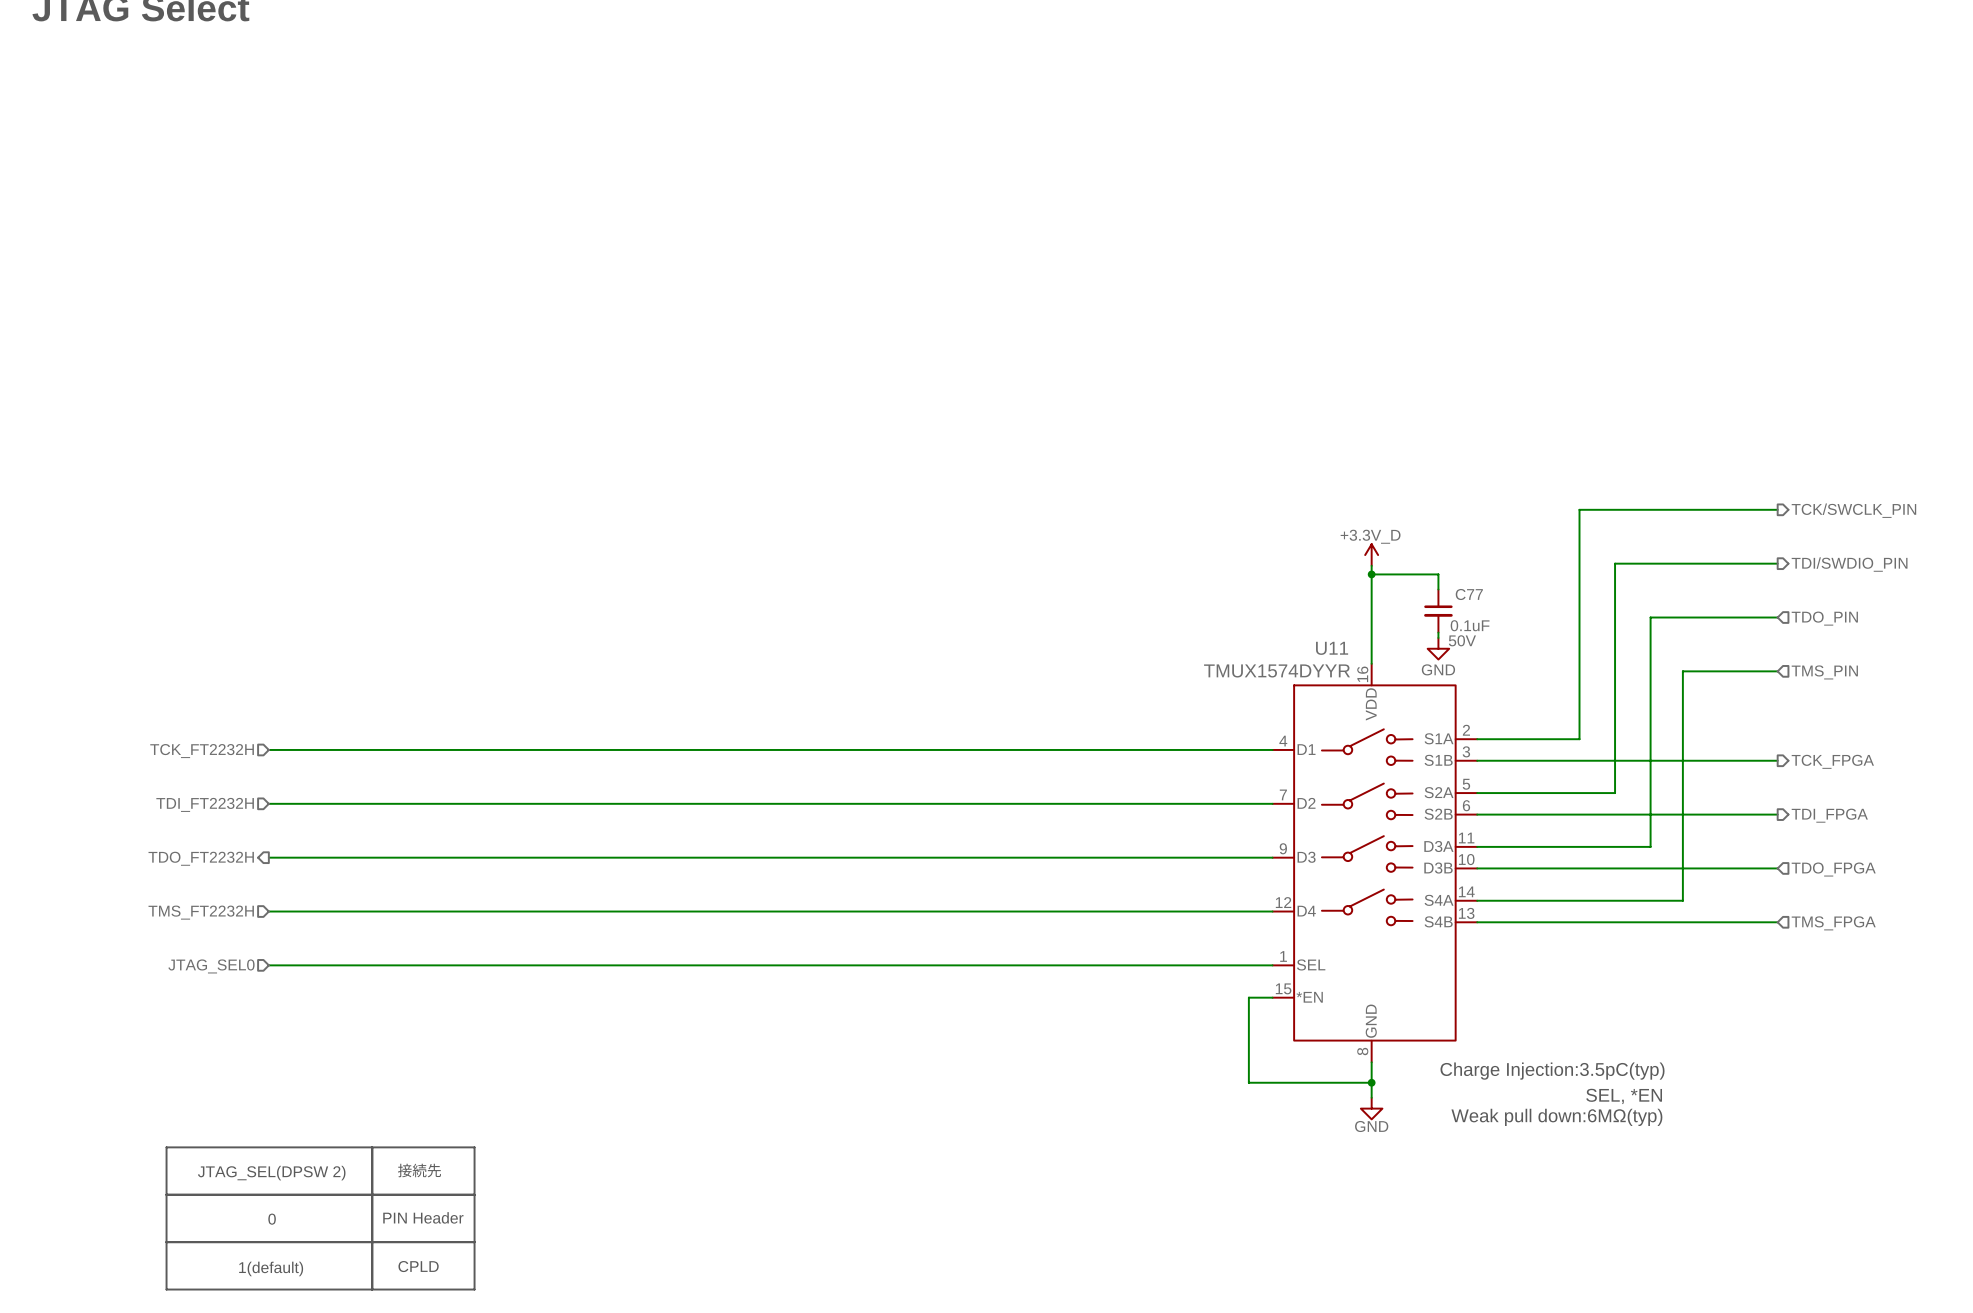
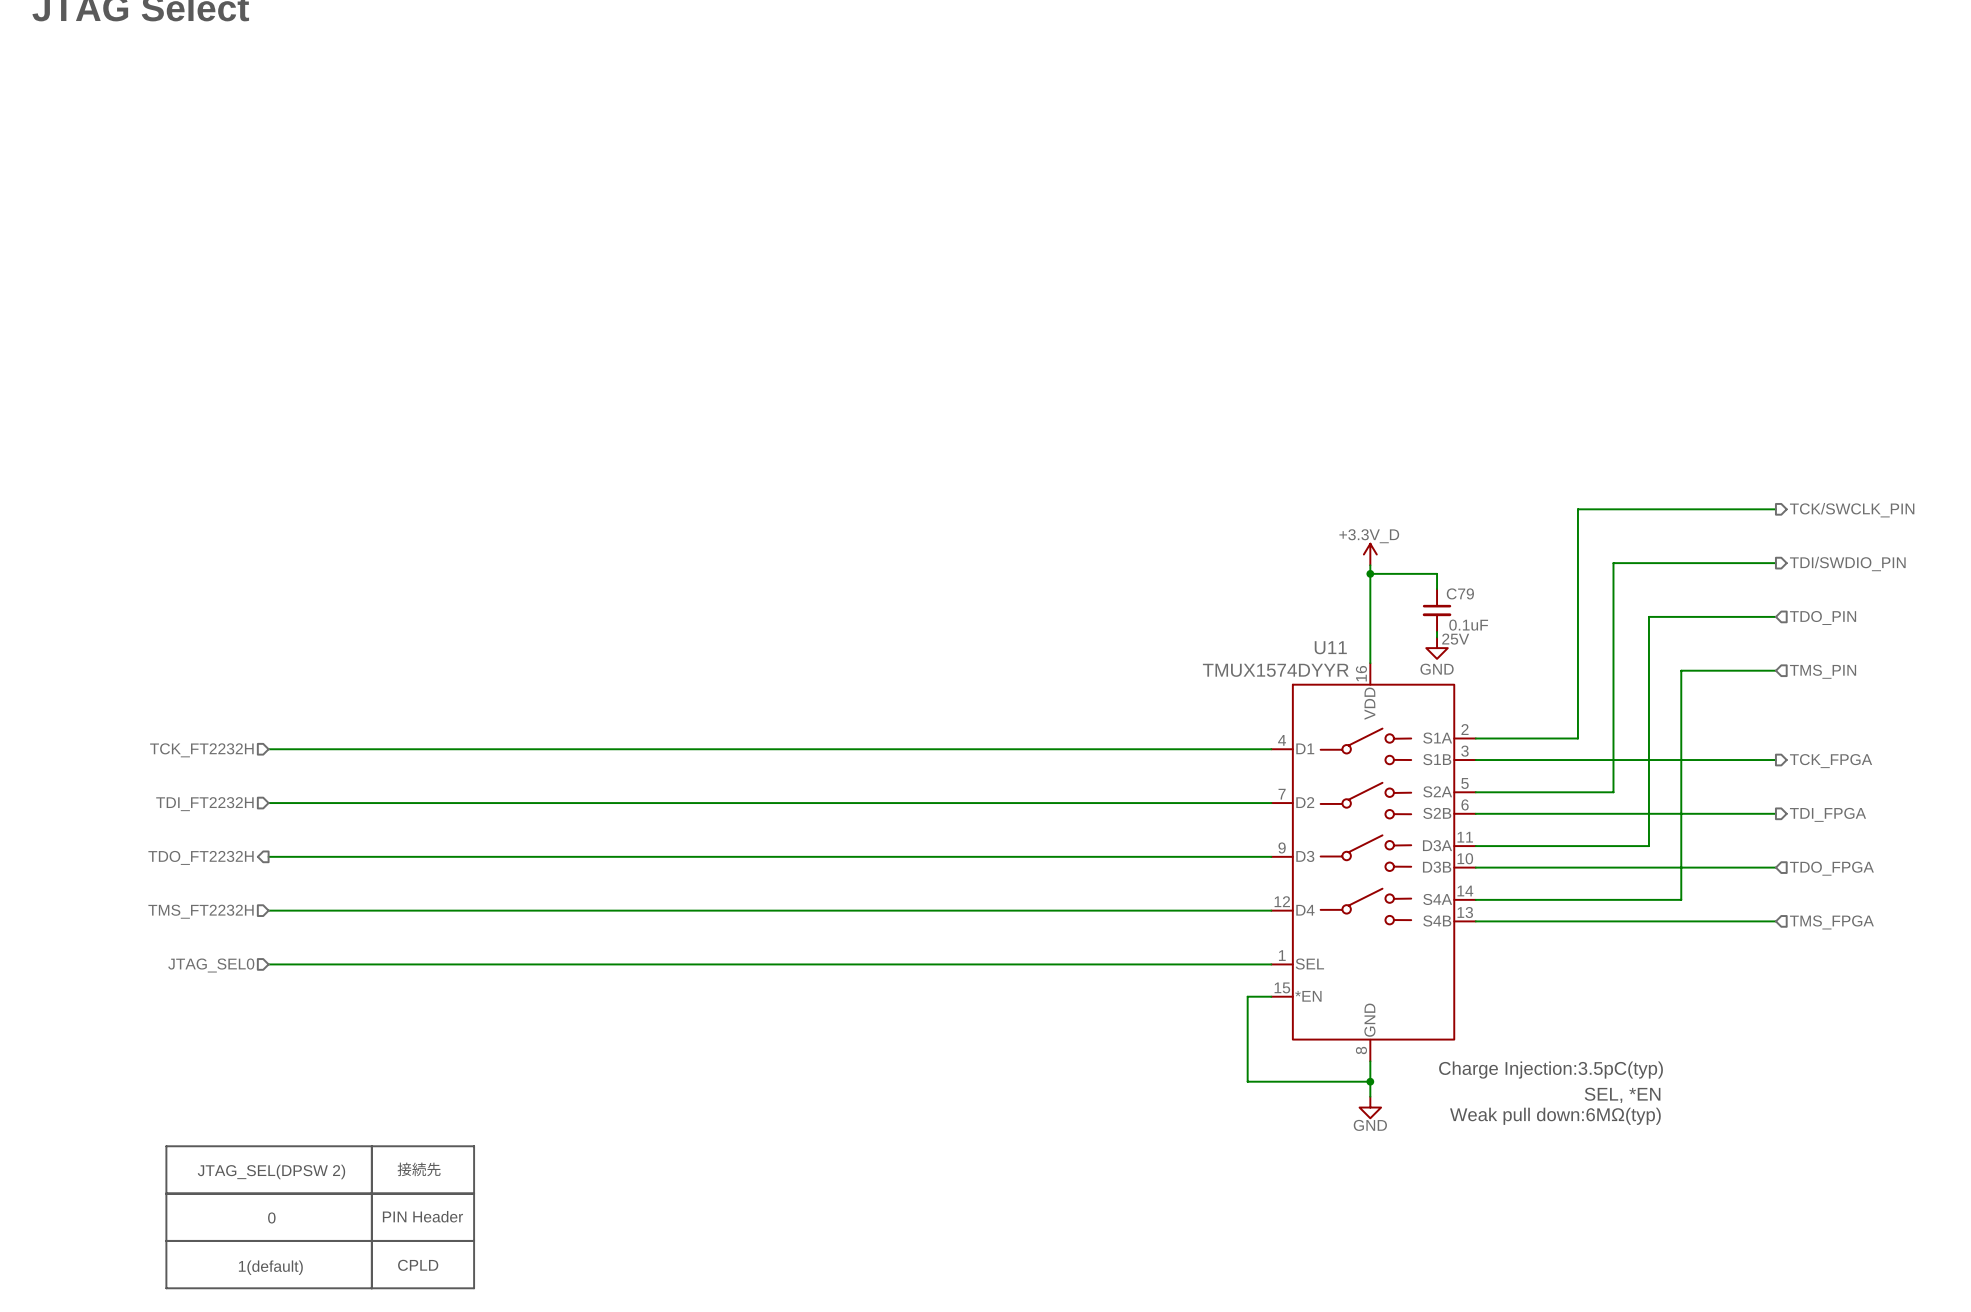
C77 name: C77 (1469, 594) -> C79 (1460, 593)
C77 text: 50V (1462, 640) -> 25V (1455, 639)

